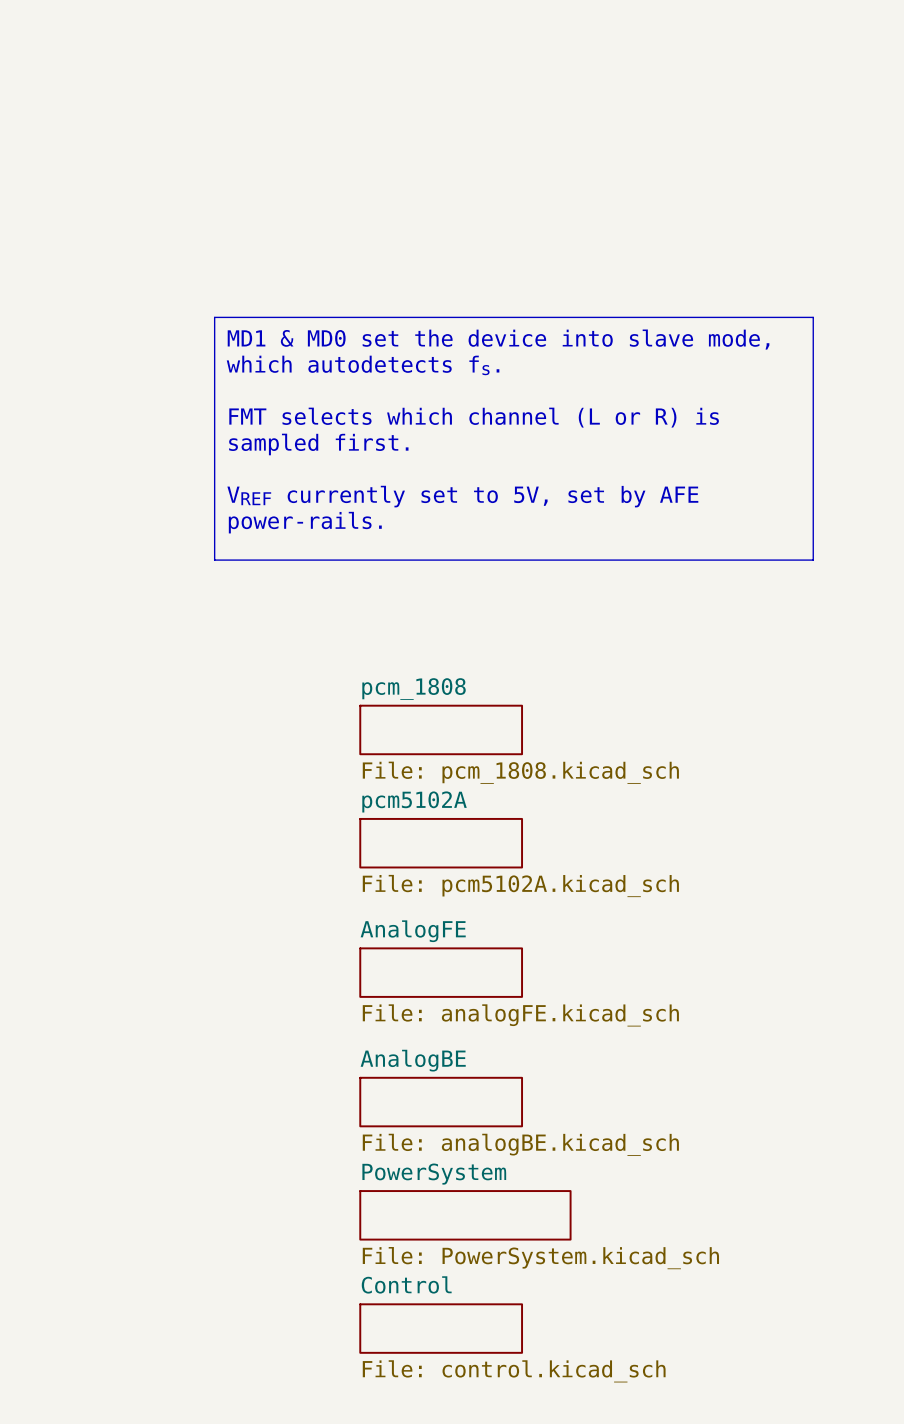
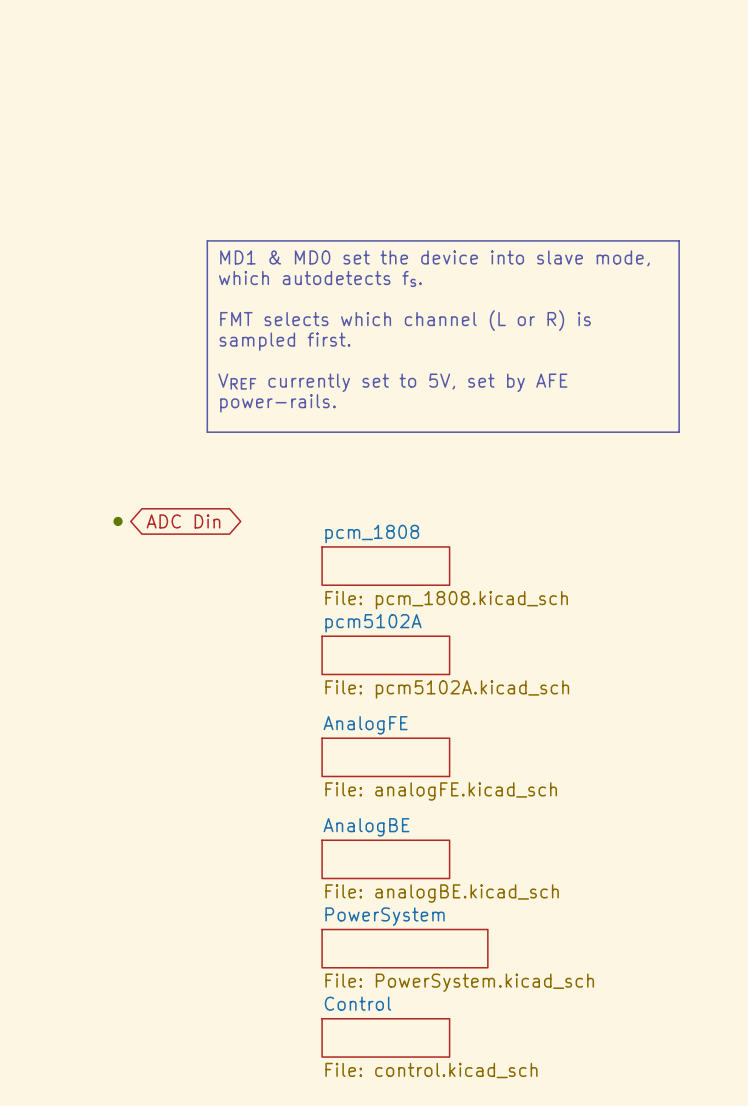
junction: none -> (118, 521)
global label: none -> ADC Din (183, 521)

